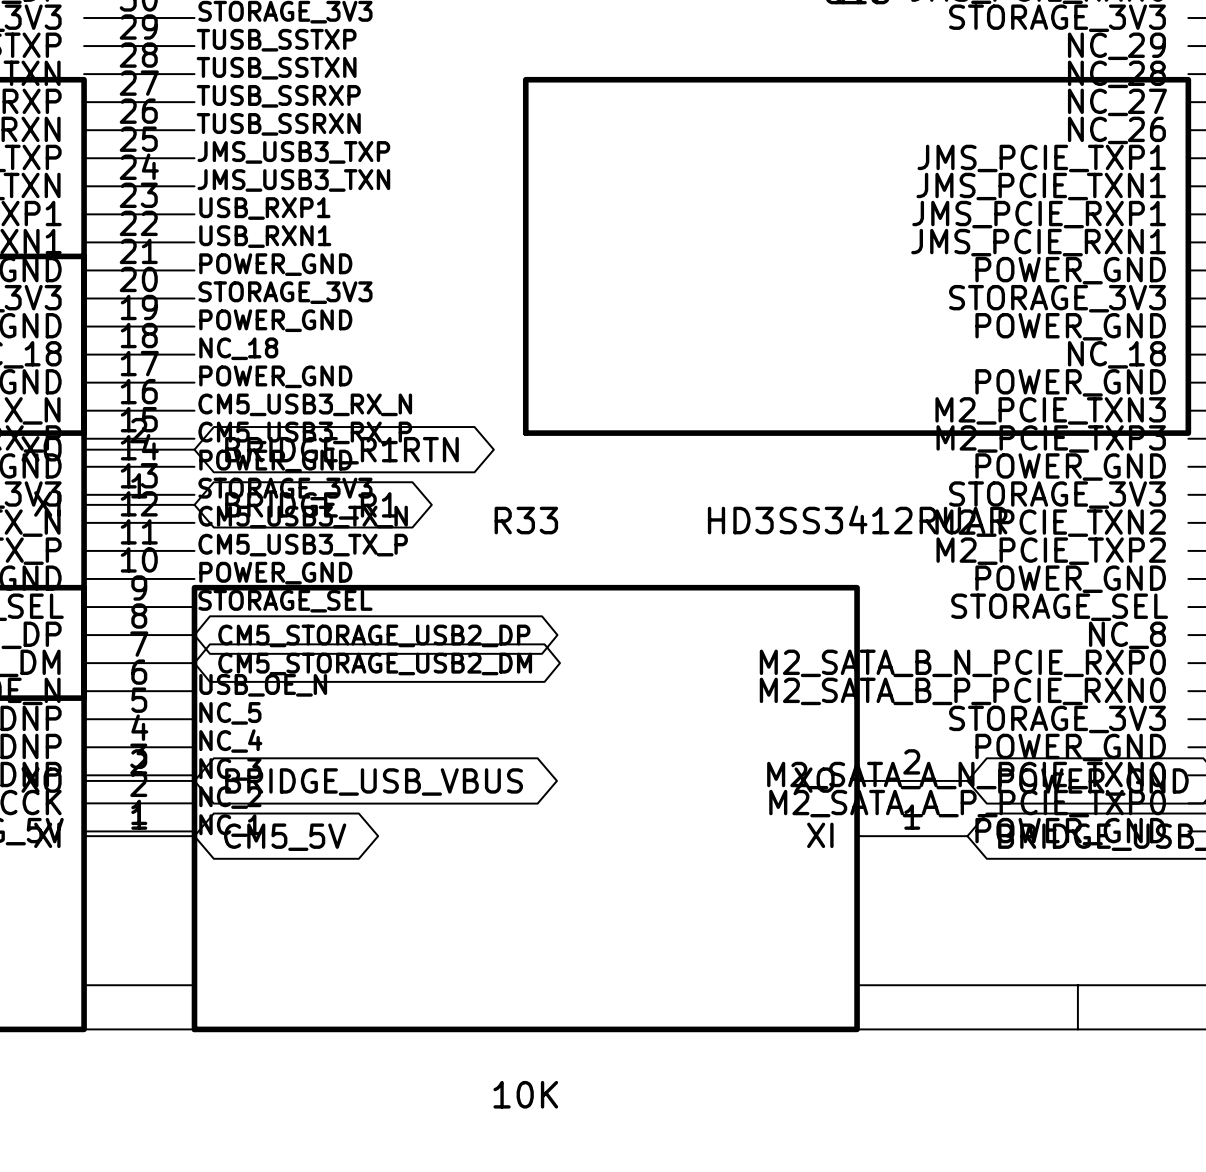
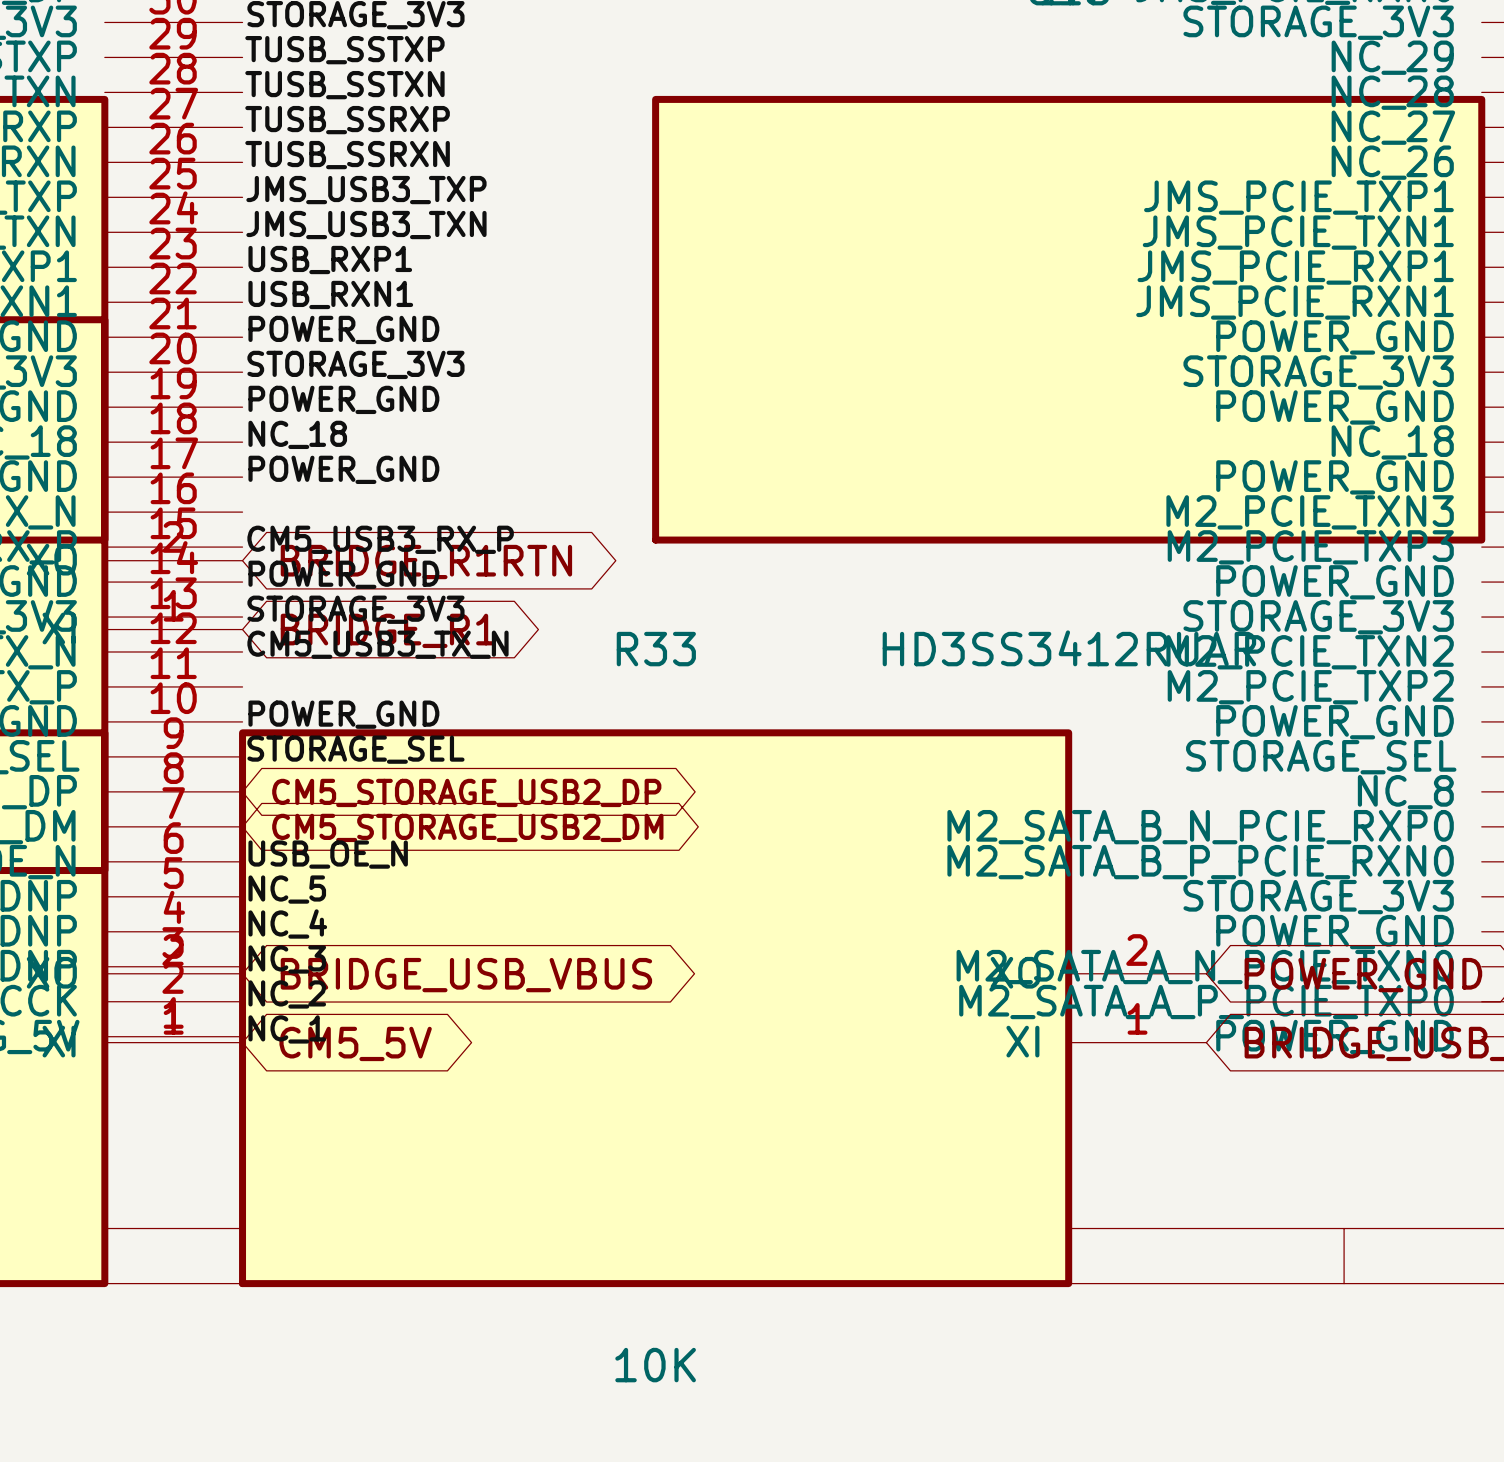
label: CM5_USB3_RX_N (305, 404) -> none
label: CM5_USB3_TX_P (303, 545) -> none

